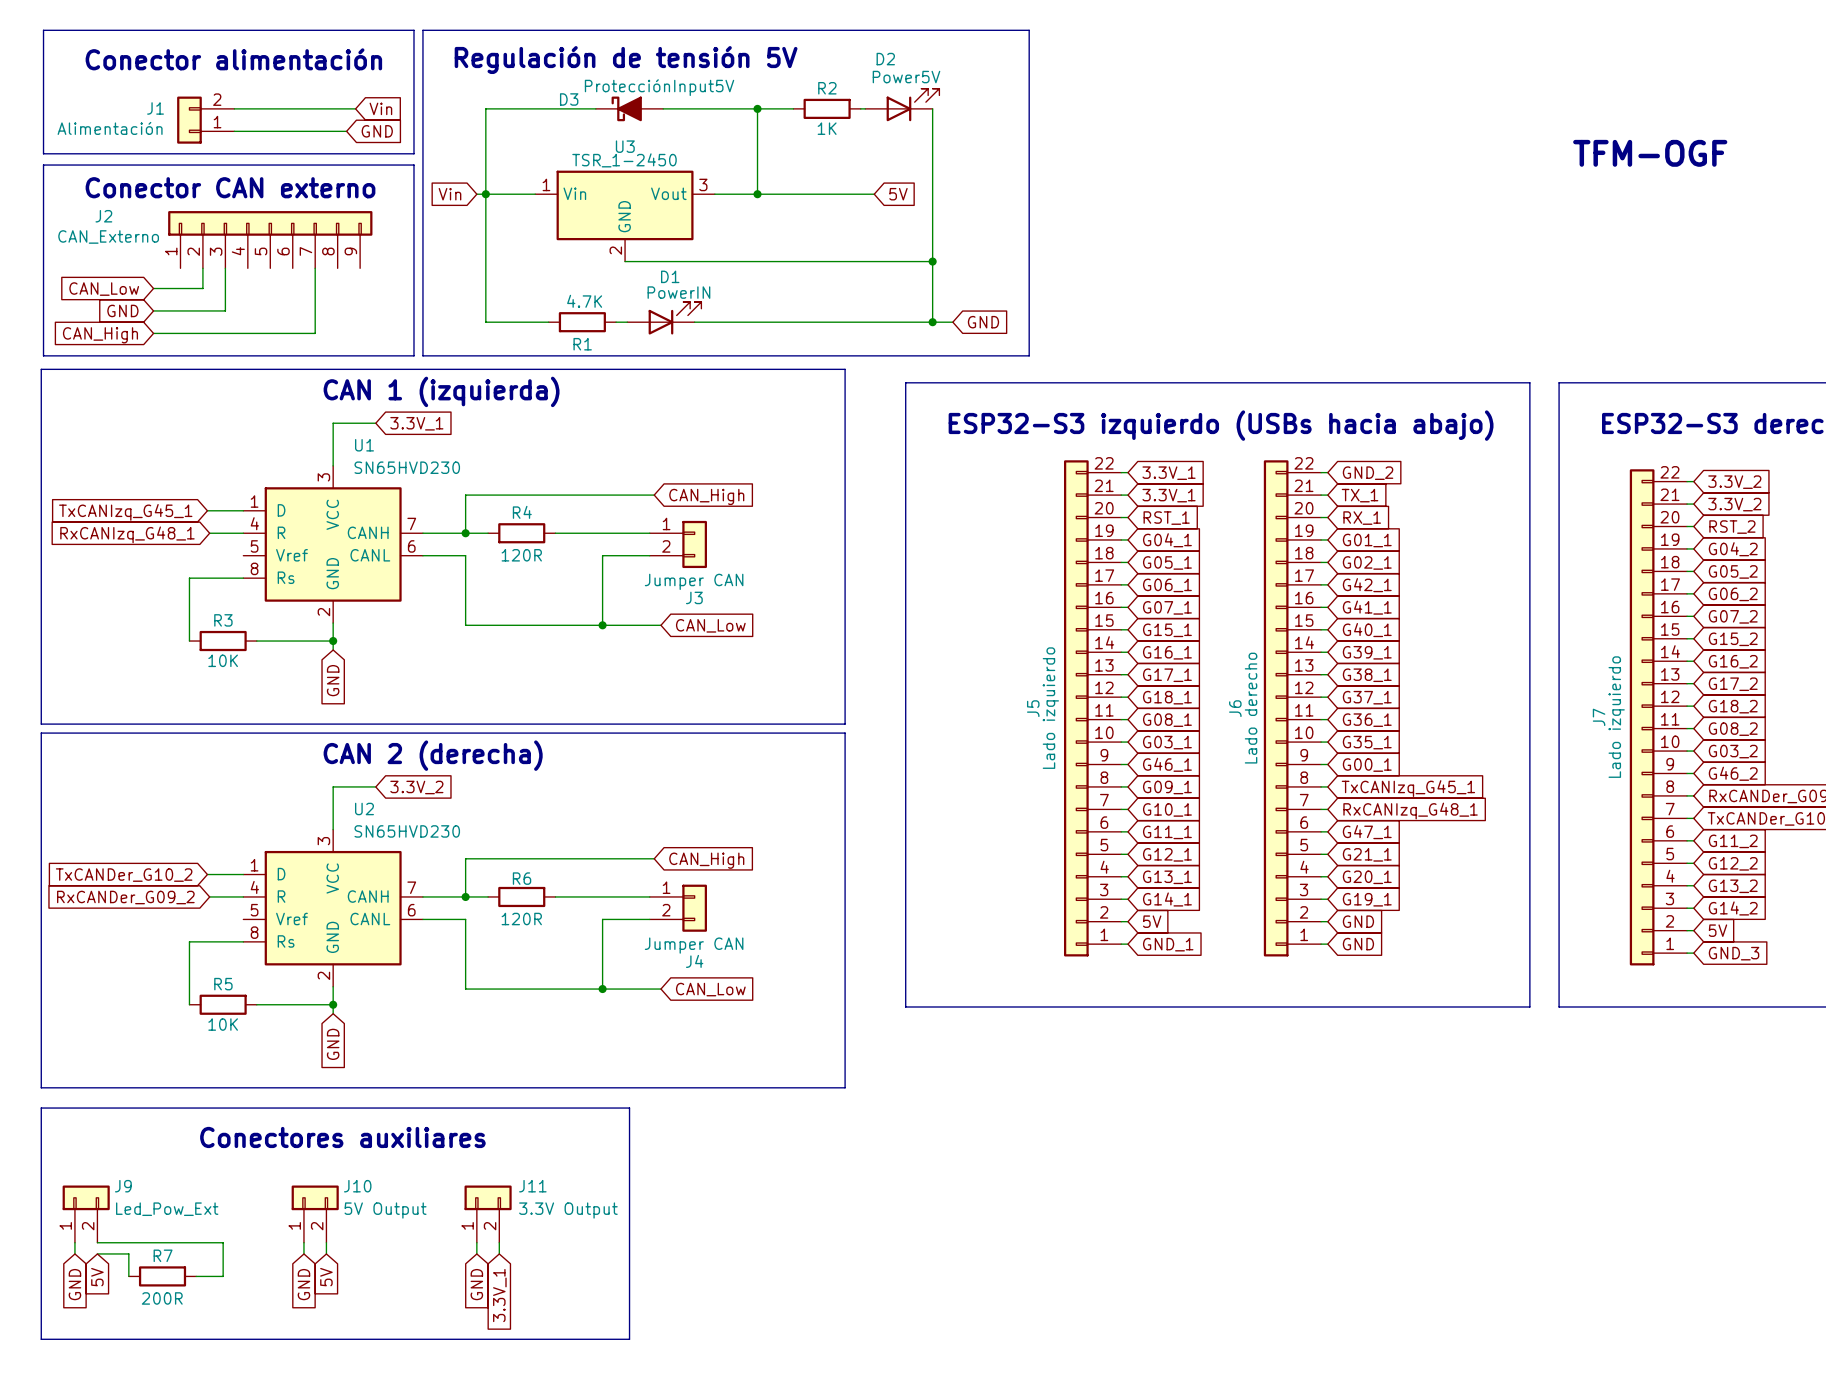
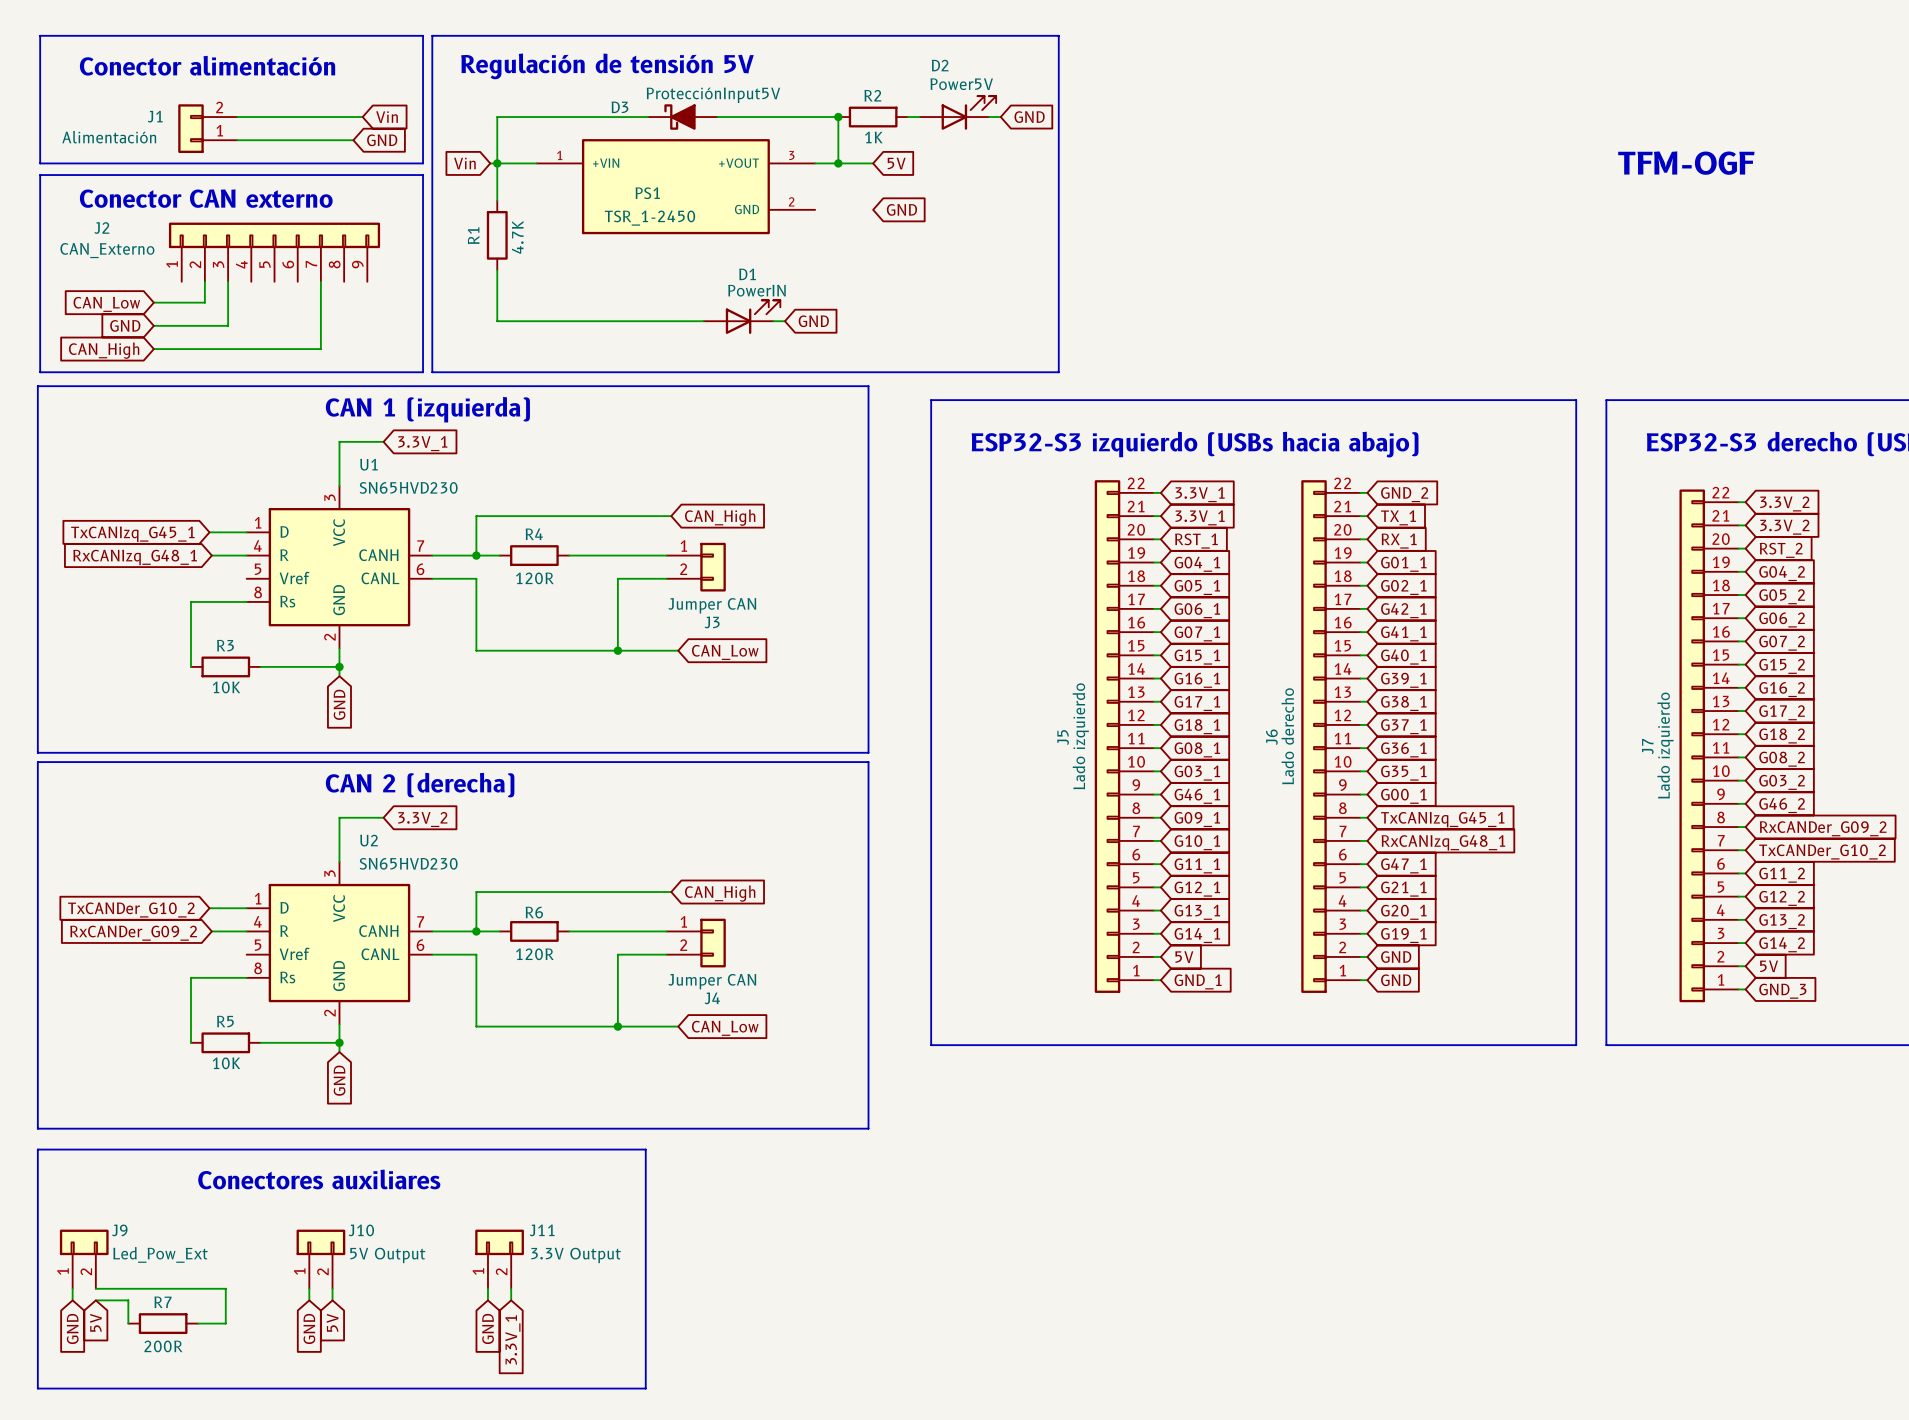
D2 position: (902, 104) -> (957, 112)
D3 position: (629, 108) -> (682, 117)
wire: (757, 108) (757, 194) -> none
junction: (757, 108) -> none
wire: none -> (815, 117) (838, 117) (838, 163)
junction: none -> (838, 117)
R2 position: (827, 108) -> (873, 117)
wire: (860, 108) (865, 108) -> none
wire: (932, 108) (932, 322) -> none
wire: none -> (989, 117) (1000, 117)
global label: none -> GND (1029, 117)
wire: none -> (490, 163) (536, 163)
wire: none -> (815, 163) (873, 163)
junction: none -> (838, 163)
PS1: none -> TSR_1-2450 (675, 186)
wire: (485, 189) (485, 257) -> none
global label position: Vin (449, 194) -> Vin (464, 163)
wire: (476, 194) (535, 194) -> none
junction position: (485, 194) -> (497, 163)
wire: (714, 194) (874, 194) -> none
junction: (757, 194) -> none
global label position: 5V (898, 194) -> 5V (896, 163)
global label: none -> GND (901, 209)
U3: TSR_1-2450 (625, 216) -> none
wire: (625, 261) (932, 261) -> none
junction: (932, 261) -> none
wire: (485, 306) (485, 322) (548, 322) -> (497, 321) (703, 321)
global label: none -> GND (813, 321)
D1 position: (664, 318) -> (742, 317)
R1 rotation: 0° (582, 322) -> 90° clockwise (497, 235)
R1 position: (582, 322) -> (497, 235)
wire: (616, 322) (627, 322) -> (773, 321) (784, 321)
wire: (694, 322) (952, 322) -> none
junction: (932, 322) -> none
global label: GND (983, 322) -> none

